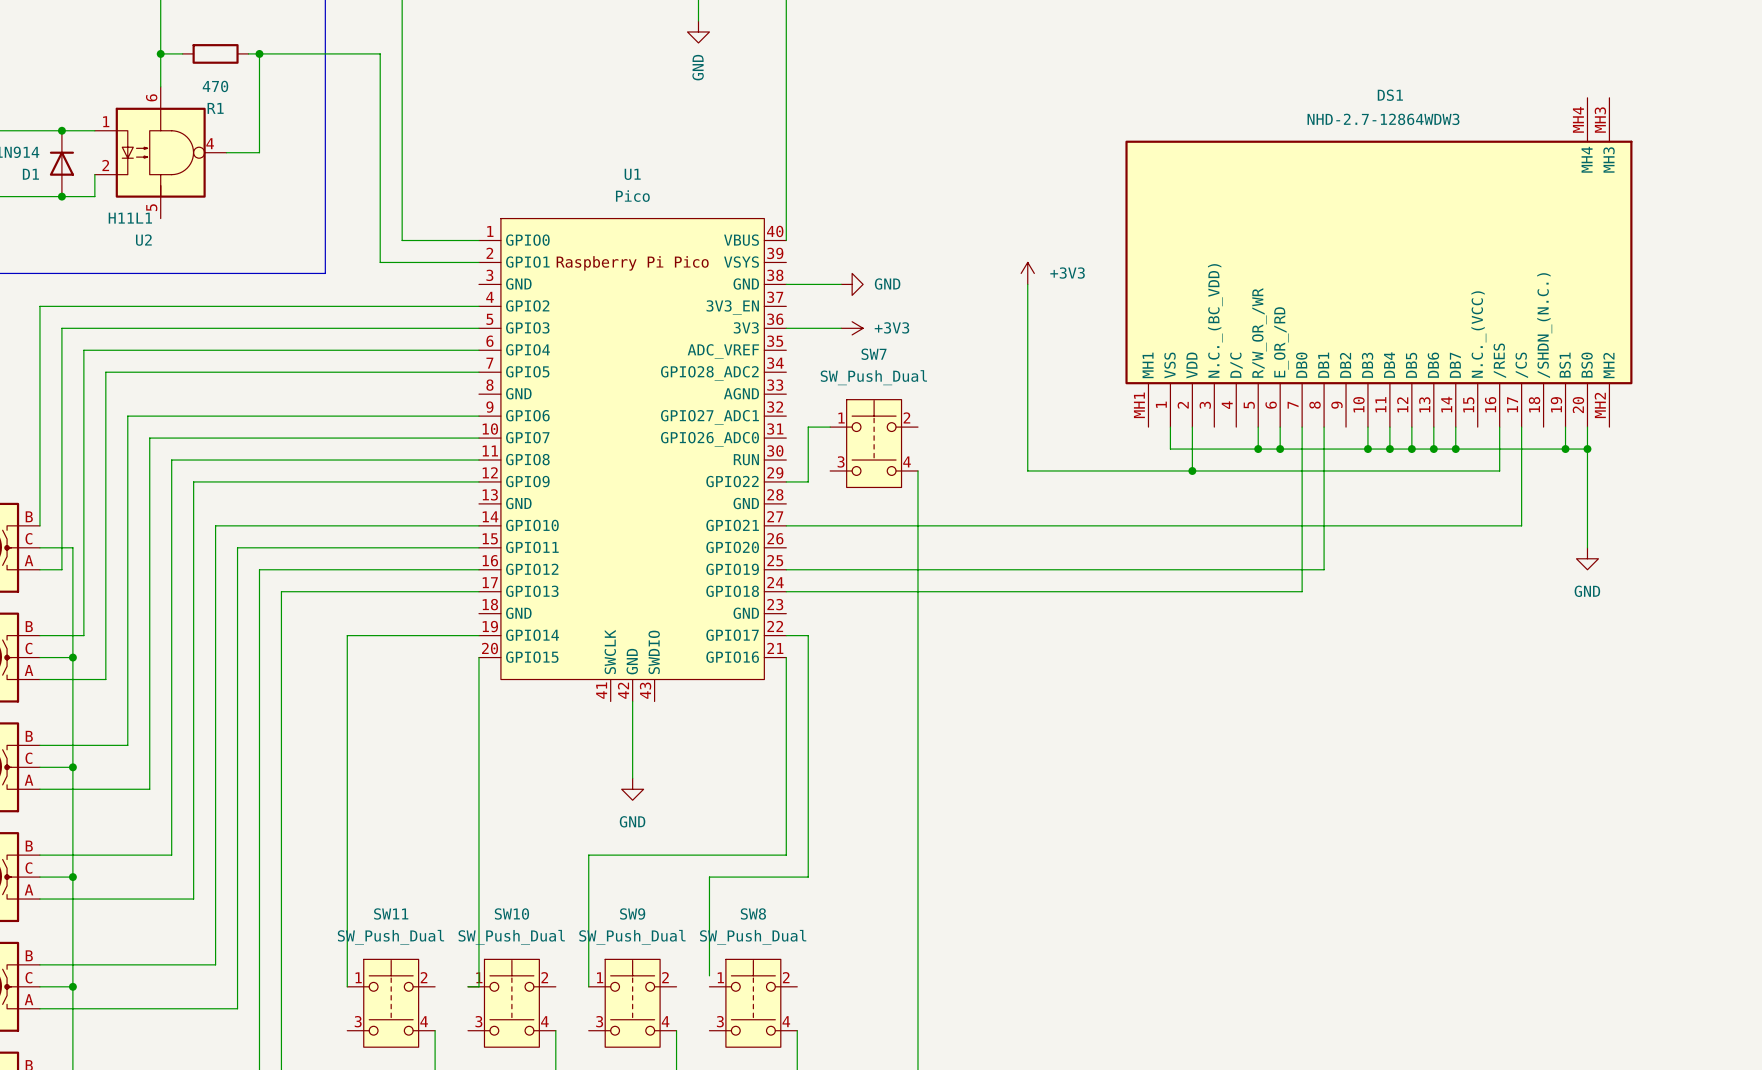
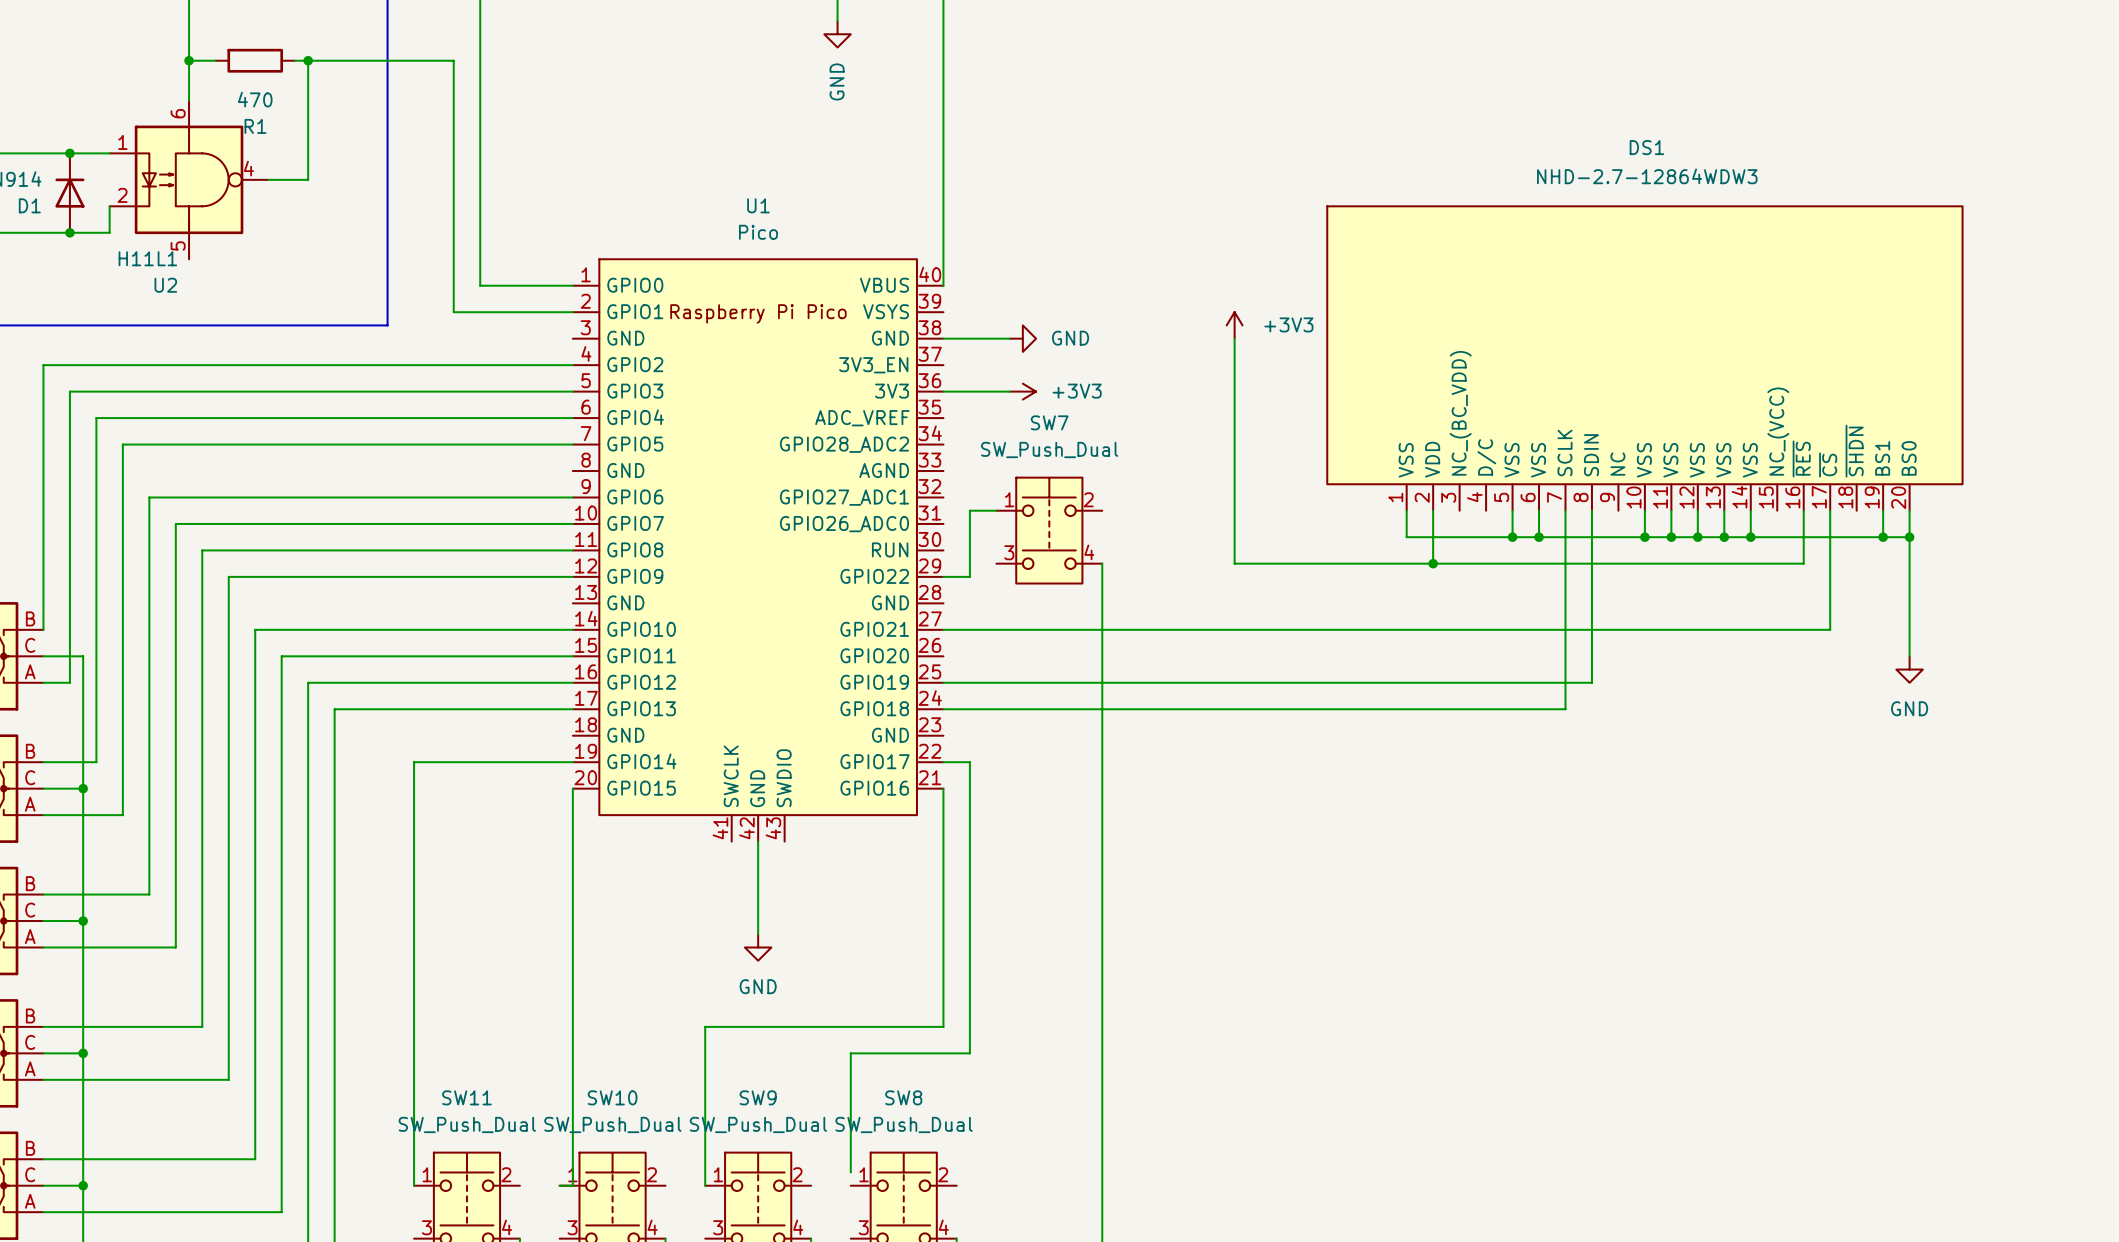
DS1 symbol: [1125, 97, 1633, 428] -> [1327, 206, 1963, 511]
DS1 value position: NHD-2.7-12864WDW3 (1383, 119) -> NHD-2.7-12864WDW3 (1647, 176)

